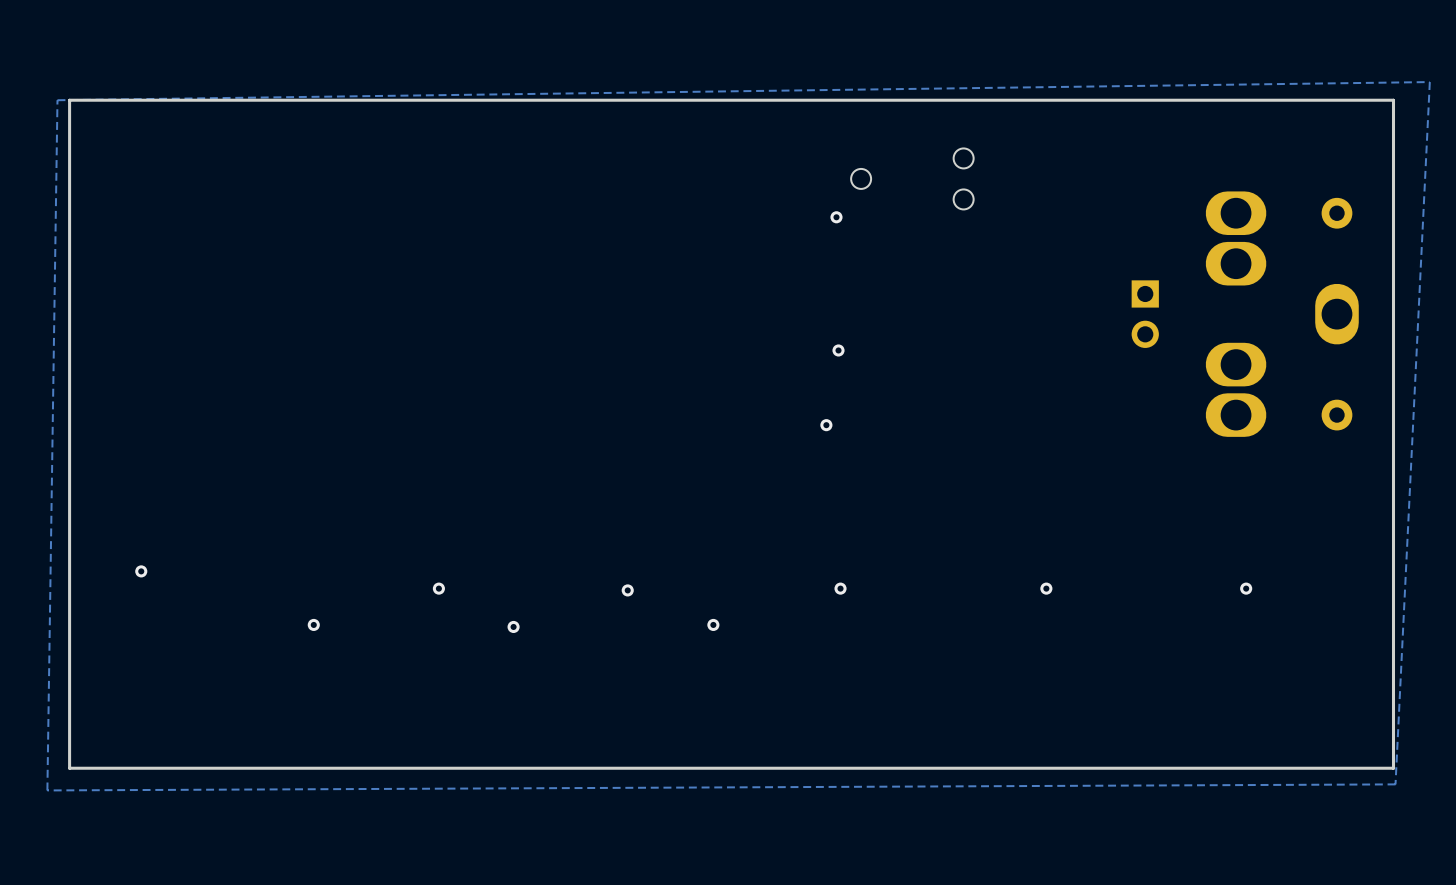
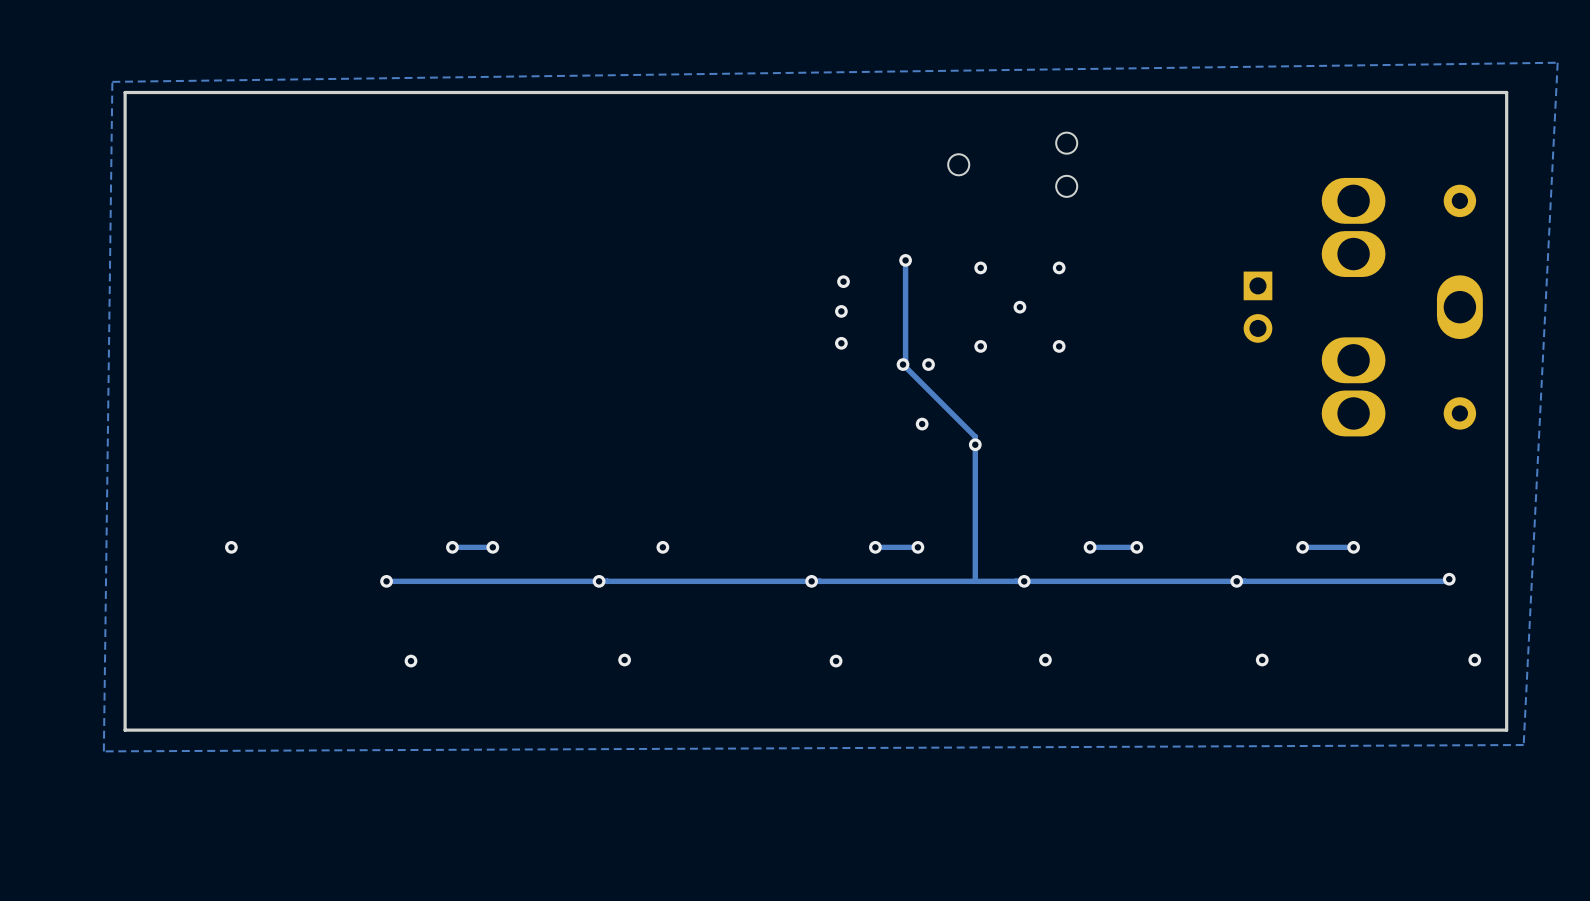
zone outline: (1429, 82) (1395, 784) (47, 790) (57, 100) -> (1557, 62) (1523, 745) (103, 751) (112, 81)
board edge: (69, 110) (69, 100) (1393, 100) (1393, 768) (69, 768) (69, 715) -> (125, 92) (1506, 92) (1506, 730) (125, 730)
via: (836, 217) -> none
track: none -> (905, 260) (905, 362) (903, 364) (975, 436) (975, 581)
via: none -> (905, 260)
via: none -> (980, 267)
via: none -> (1059, 267)
via: none -> (843, 281)
via: none -> (1019, 307)
via: none -> (841, 311)
via: none -> (841, 343)
via: (838, 350) -> none
via: none -> (980, 346)
via: none -> (1059, 346)
via: none -> (903, 364)
via: none -> (928, 364)
via: none -> (975, 444)
via: none -> (452, 547)
track: none -> (492, 547) (452, 547)
via: none -> (492, 547)
via: none -> (662, 547)
via: none -> (875, 547)
track: none -> (917, 547) (875, 547)
via: none -> (917, 547)
via: none -> (1090, 547)
track: none -> (1136, 547) (1090, 547)
via: none -> (1136, 547)
via: none -> (1302, 547)
track: none -> (1353, 547) (1302, 547)
via: none -> (1353, 547)
via position: (141, 571) -> (231, 547)
track: none -> (1449, 579) (1447, 581) (386, 581)
via: none -> (1449, 579)
via: none -> (386, 581)
via: none -> (599, 581)
via: none -> (811, 581)
via: none -> (1024, 581)
via: none -> (1236, 581)
via: (438, 588) -> none
via: (840, 588) -> none
via: (1046, 588) -> none
via: (1246, 588) -> none
via: (627, 590) -> none
via: (313, 624) -> none
via: (713, 624) -> none
via: (513, 626) -> none
via: none -> (624, 659)
via: none -> (1045, 659)
via: none -> (1262, 659)
via: none -> (1474, 659)
via: none -> (410, 661)
via: none -> (836, 661)

